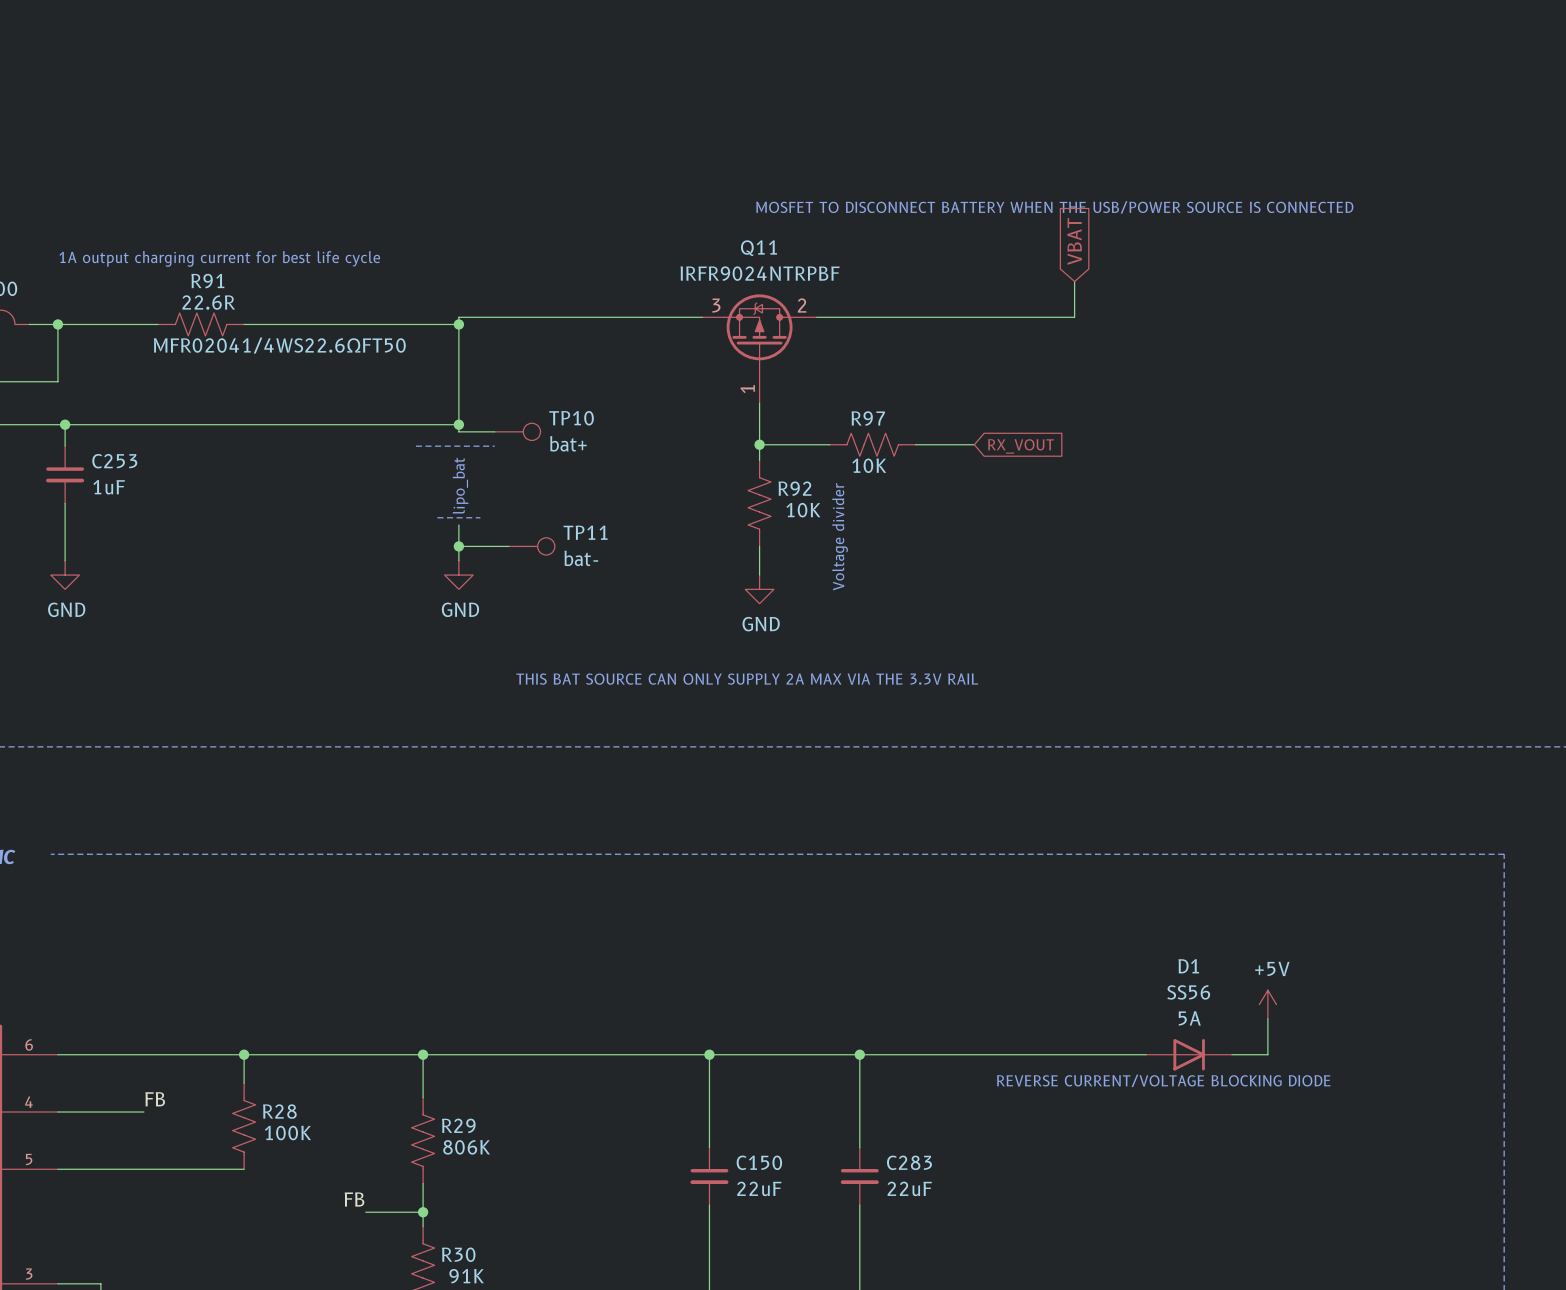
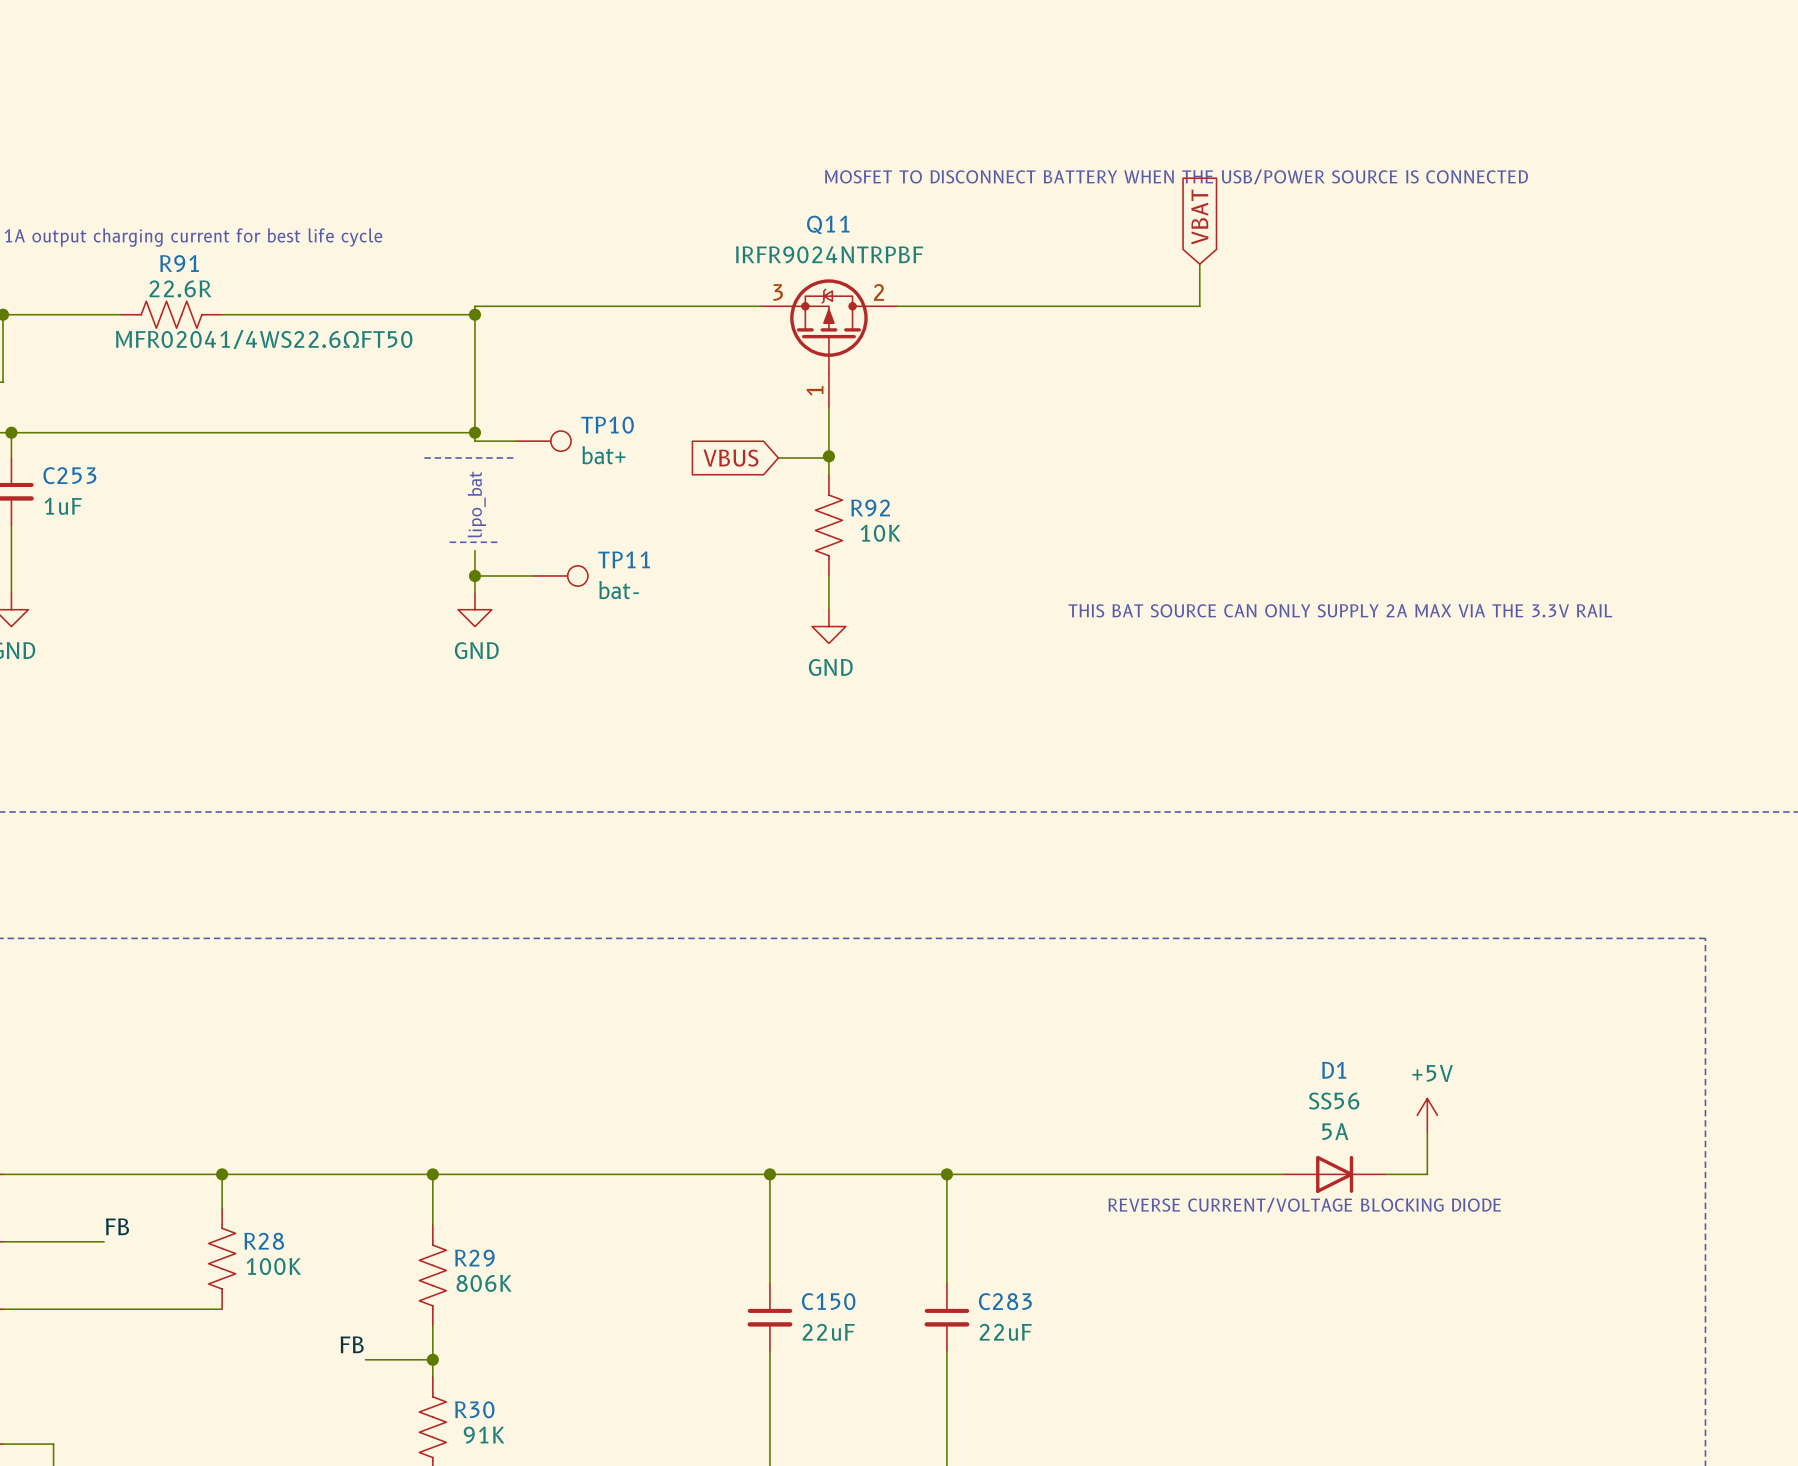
wire: (759, 444) (829, 444) -> none
R97: 10K (872, 444) -> none
wire: (915, 444) (974, 444) -> none
global label: none -> VBUS (731, 458)
wire: none -> (778, 458) (828, 458)
global label: RX_VOUT (1020, 446) -> none
text: Voltage divider (840, 536) -> none
text: none -> THIS BAT SOURCE CAN ONLY SUPPLY 2A MAX VIA THE 3.3V RAIL (1340, 610)
text: THIS BAT SOURCE CAN ONLY SUPPLY 2A MAX VIA THE 3.3V RAIL (747, 679) -> none

